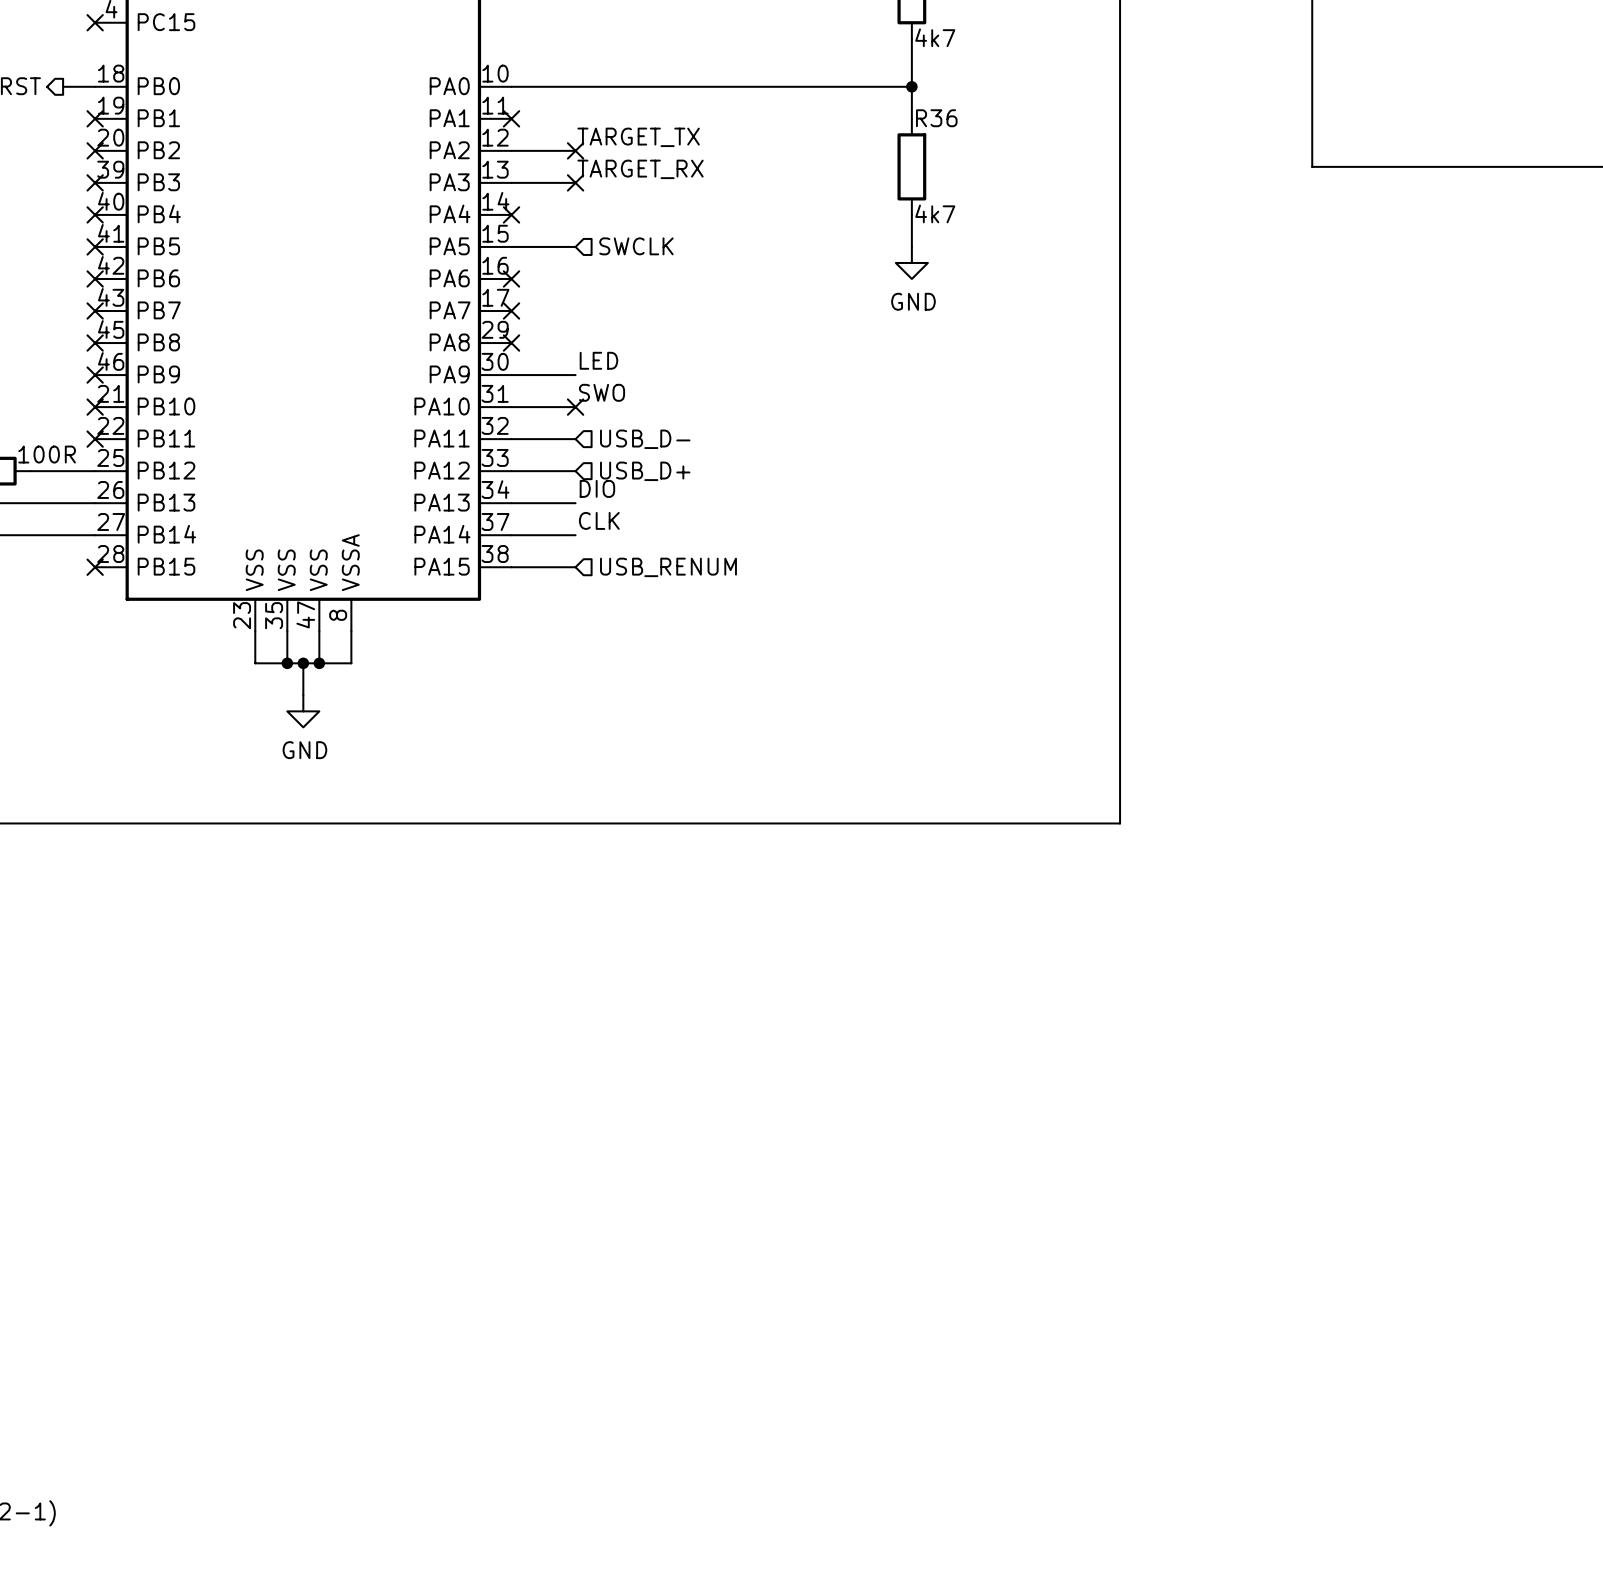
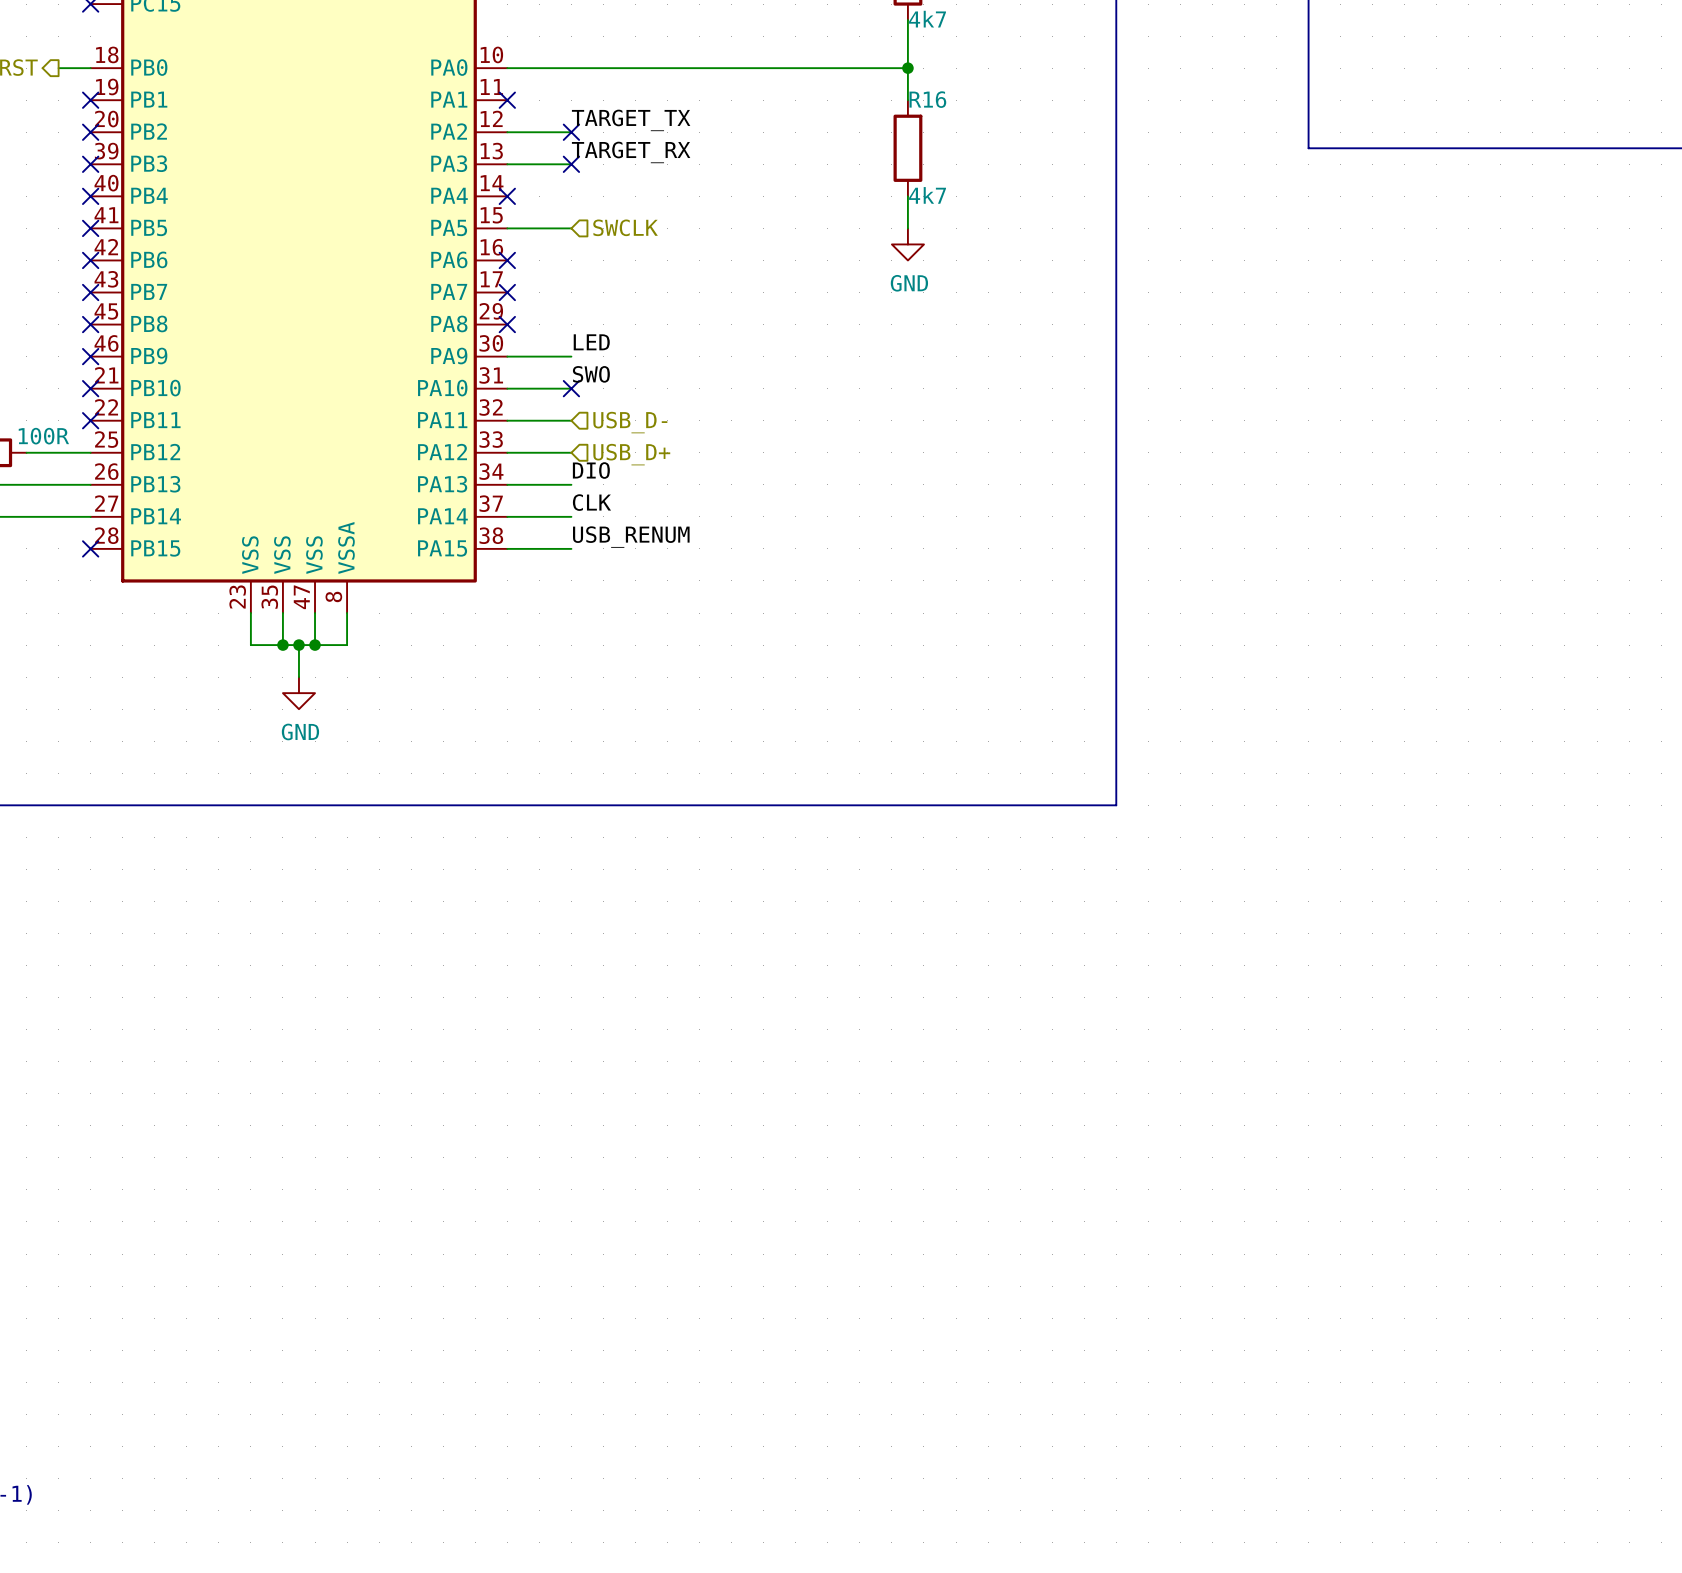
R36 name: R36 (936, 118) -> R16 (927, 99)
label: none -> USB_RENUM (631, 537)
hierarchical label: USB_RENUM (668, 567) -> none

